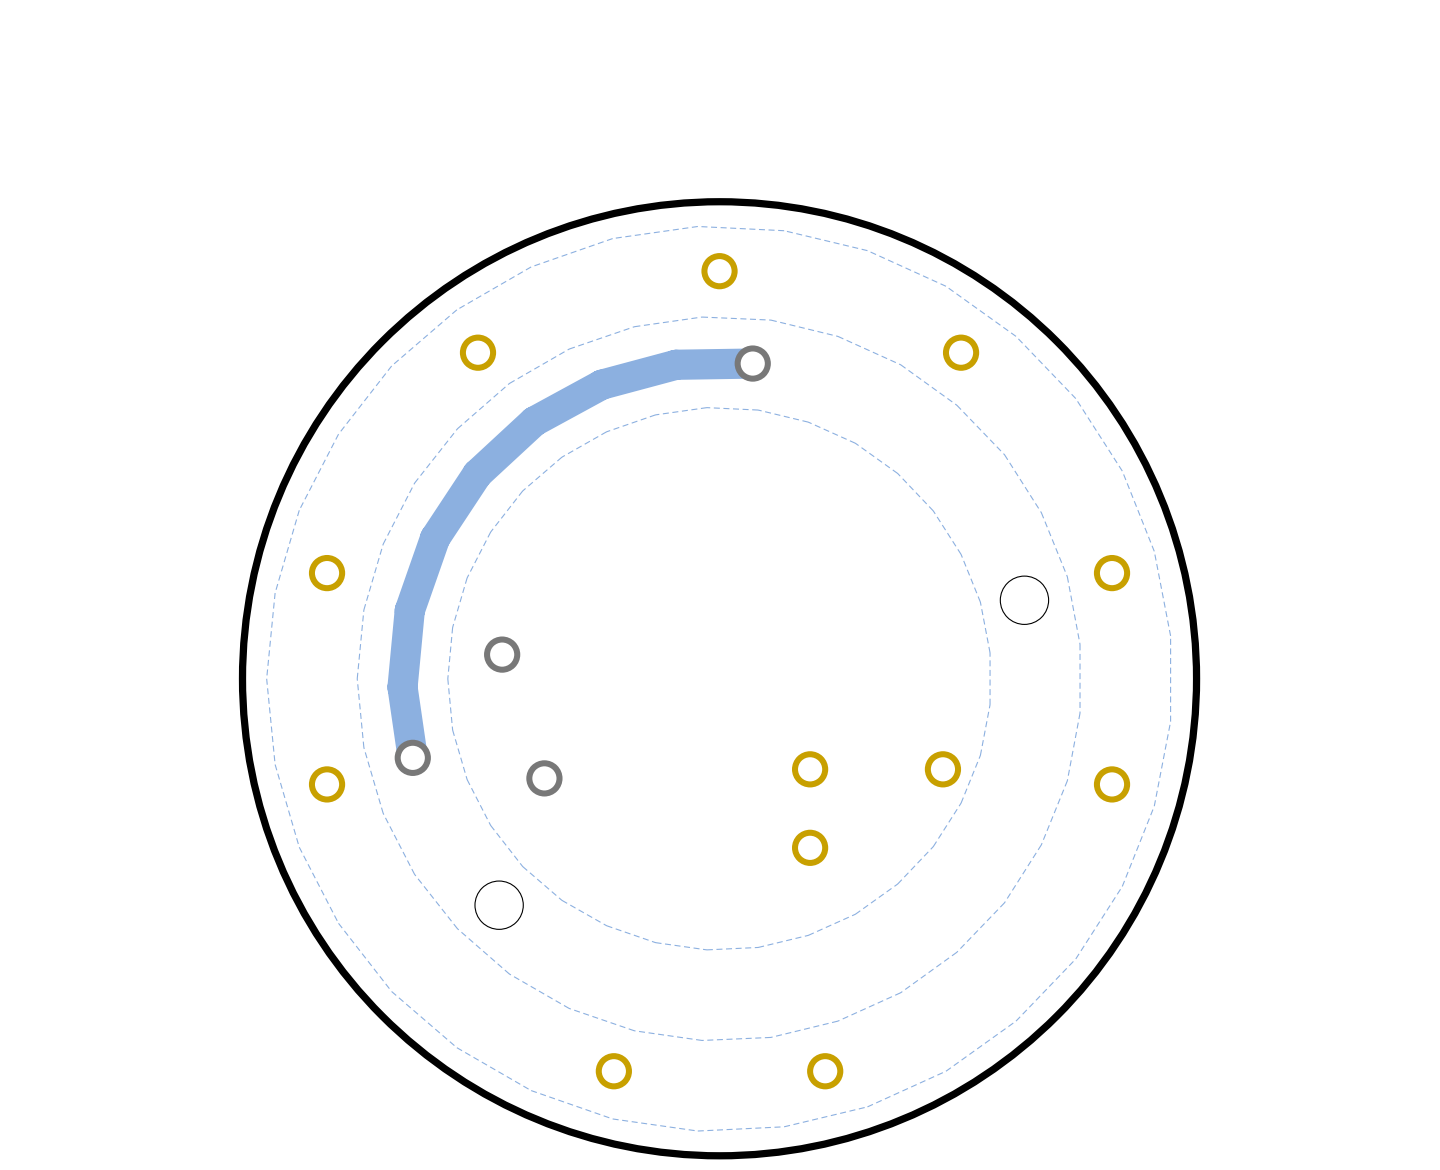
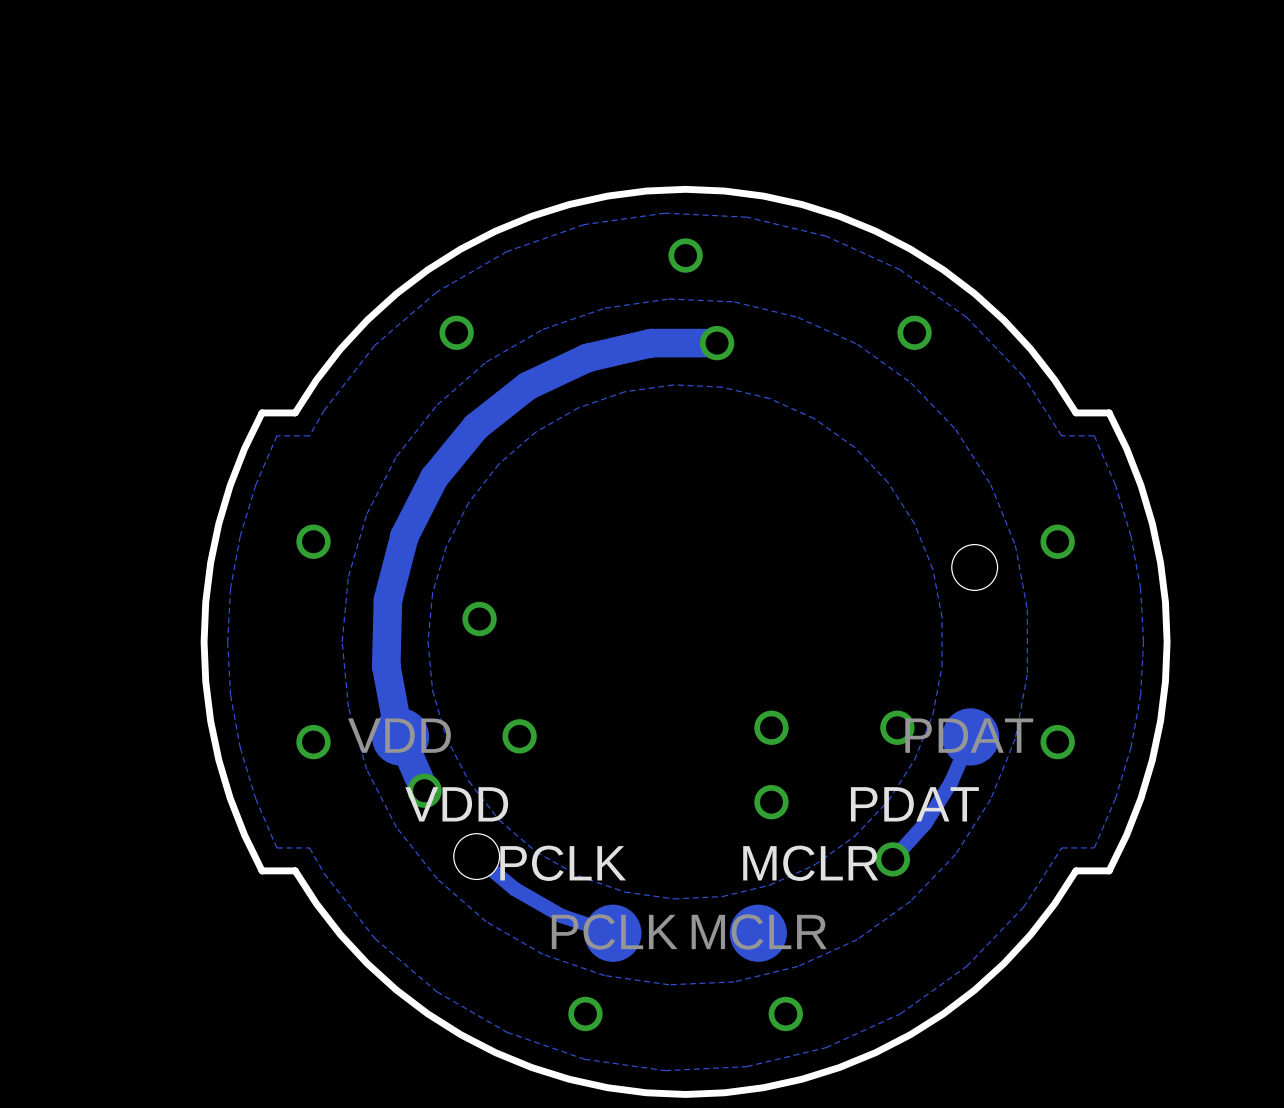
round board edge: [238, 198, 1201, 1160] -> none
track: (752, 363) (676, 364) (601, 384) (534, 421) (477, 474) (435, 538) (409, 610) (402, 687) (412, 757) -> (717, 343) (651, 343) (587, 357) (527, 386) (476, 426) (434, 477) (404, 536) (387, 600) (386, 665) (398, 730) (424, 790)
zone outline: (1075, 398) (1122, 471) (1154, 551) (1170, 635) (1170, 721) (1154, 806) (1122, 886) (1075, 958) -> (1023, 376) (1061, 435) (1094, 435) (1115, 485) (1130, 536) (1140, 588) (1143, 641) (1140, 695) (1130, 747) (1115, 798) (1094, 847) (1061, 847) (1023, 907)
zone outline: (338, 434) (299, 510) (275, 593) (266, 678) (275, 764) (299, 847) (338, 923) -> (324, 410) (309, 435) (276, 435) (255, 485) (240, 536) (230, 588) (227, 641) (230, 695) (240, 747) (255, 798) (276, 847) (309, 847) (324, 873)
board edge: none -> (1109, 412) (1075, 412) (1054, 379) (1030, 348) (1003, 320) (974, 293) (943, 270) (910, 249) (875, 231) (839, 216) (801, 204) (763, 196) (724, 191) (685, 189) (646, 191) (607, 196) (569, 204) (531, 216) (495, 231) (460, 249) (427, 270) (396, 293) (367, 320) (340, 349) (316, 380) (295, 412) (262, 412) (244, 448) (230, 485) (218, 523) (210, 562) (205, 602) (204, 641) (205, 681) (210, 721) (218, 760) (230, 798) (244, 835) (262, 870) (295, 870) (316, 903) (340, 934) (367, 963) (396, 989) (427, 1013) (460, 1034) (495, 1052) (531, 1067) (569, 1079) (607, 1087) (646, 1092) (685, 1094) (724, 1092) (763, 1087) (801, 1079) (839, 1067) (875, 1052) (910, 1034) (943, 1013) (974, 989) (1003, 963) (1030, 934) (1054, 903) (1075, 870) (1109, 870) (1126, 835) (1141, 798) (1152, 760) (1160, 721) (1165, 681) (1167, 641) (1165, 602) (1160, 562) (1152, 523) (1141, 485) (1126, 448) (1109, 412)
via: (412, 757) -> none
VDD: none -> VDD (400, 736)
track: none -> (970, 736) (951, 782) (925, 823) (892, 859)
PDAT: none -> PDAT (970, 736)
via: none -> (424, 790)
track: none -> (473, 854) (515, 889) (561, 916) (612, 933)
via: none -> (892, 859)
PCLK: none -> PCLK (612, 933)
MCLR: none -> MCLR (758, 933)

